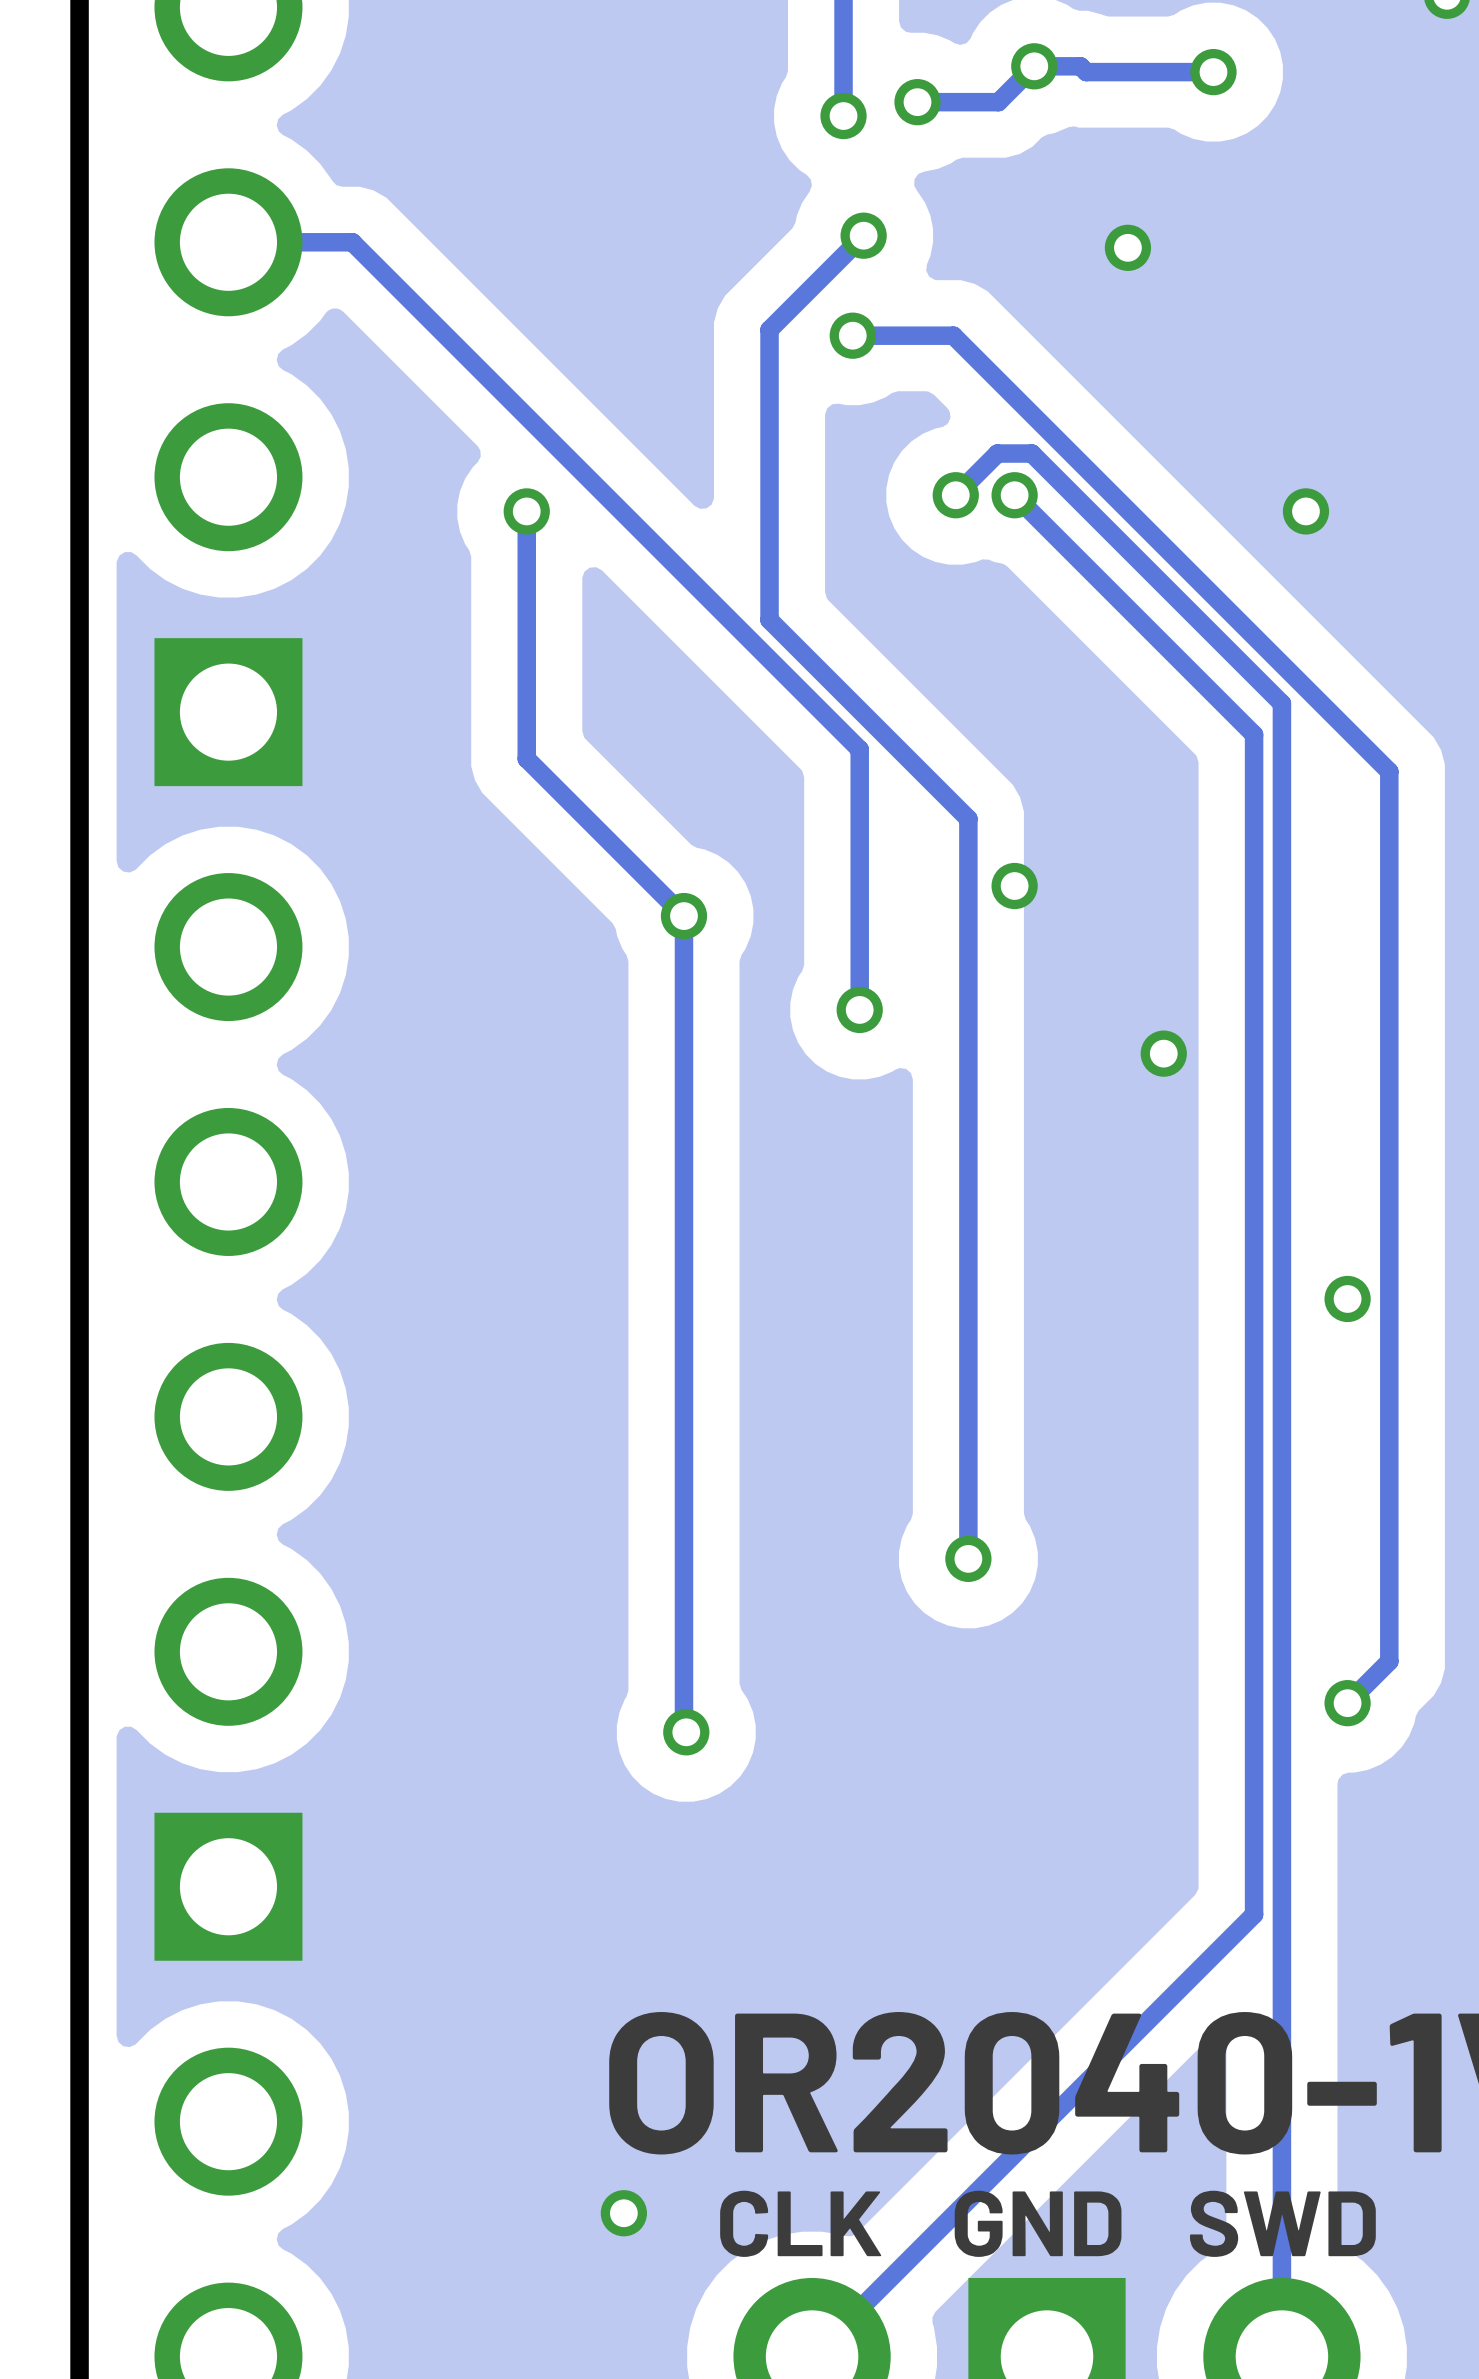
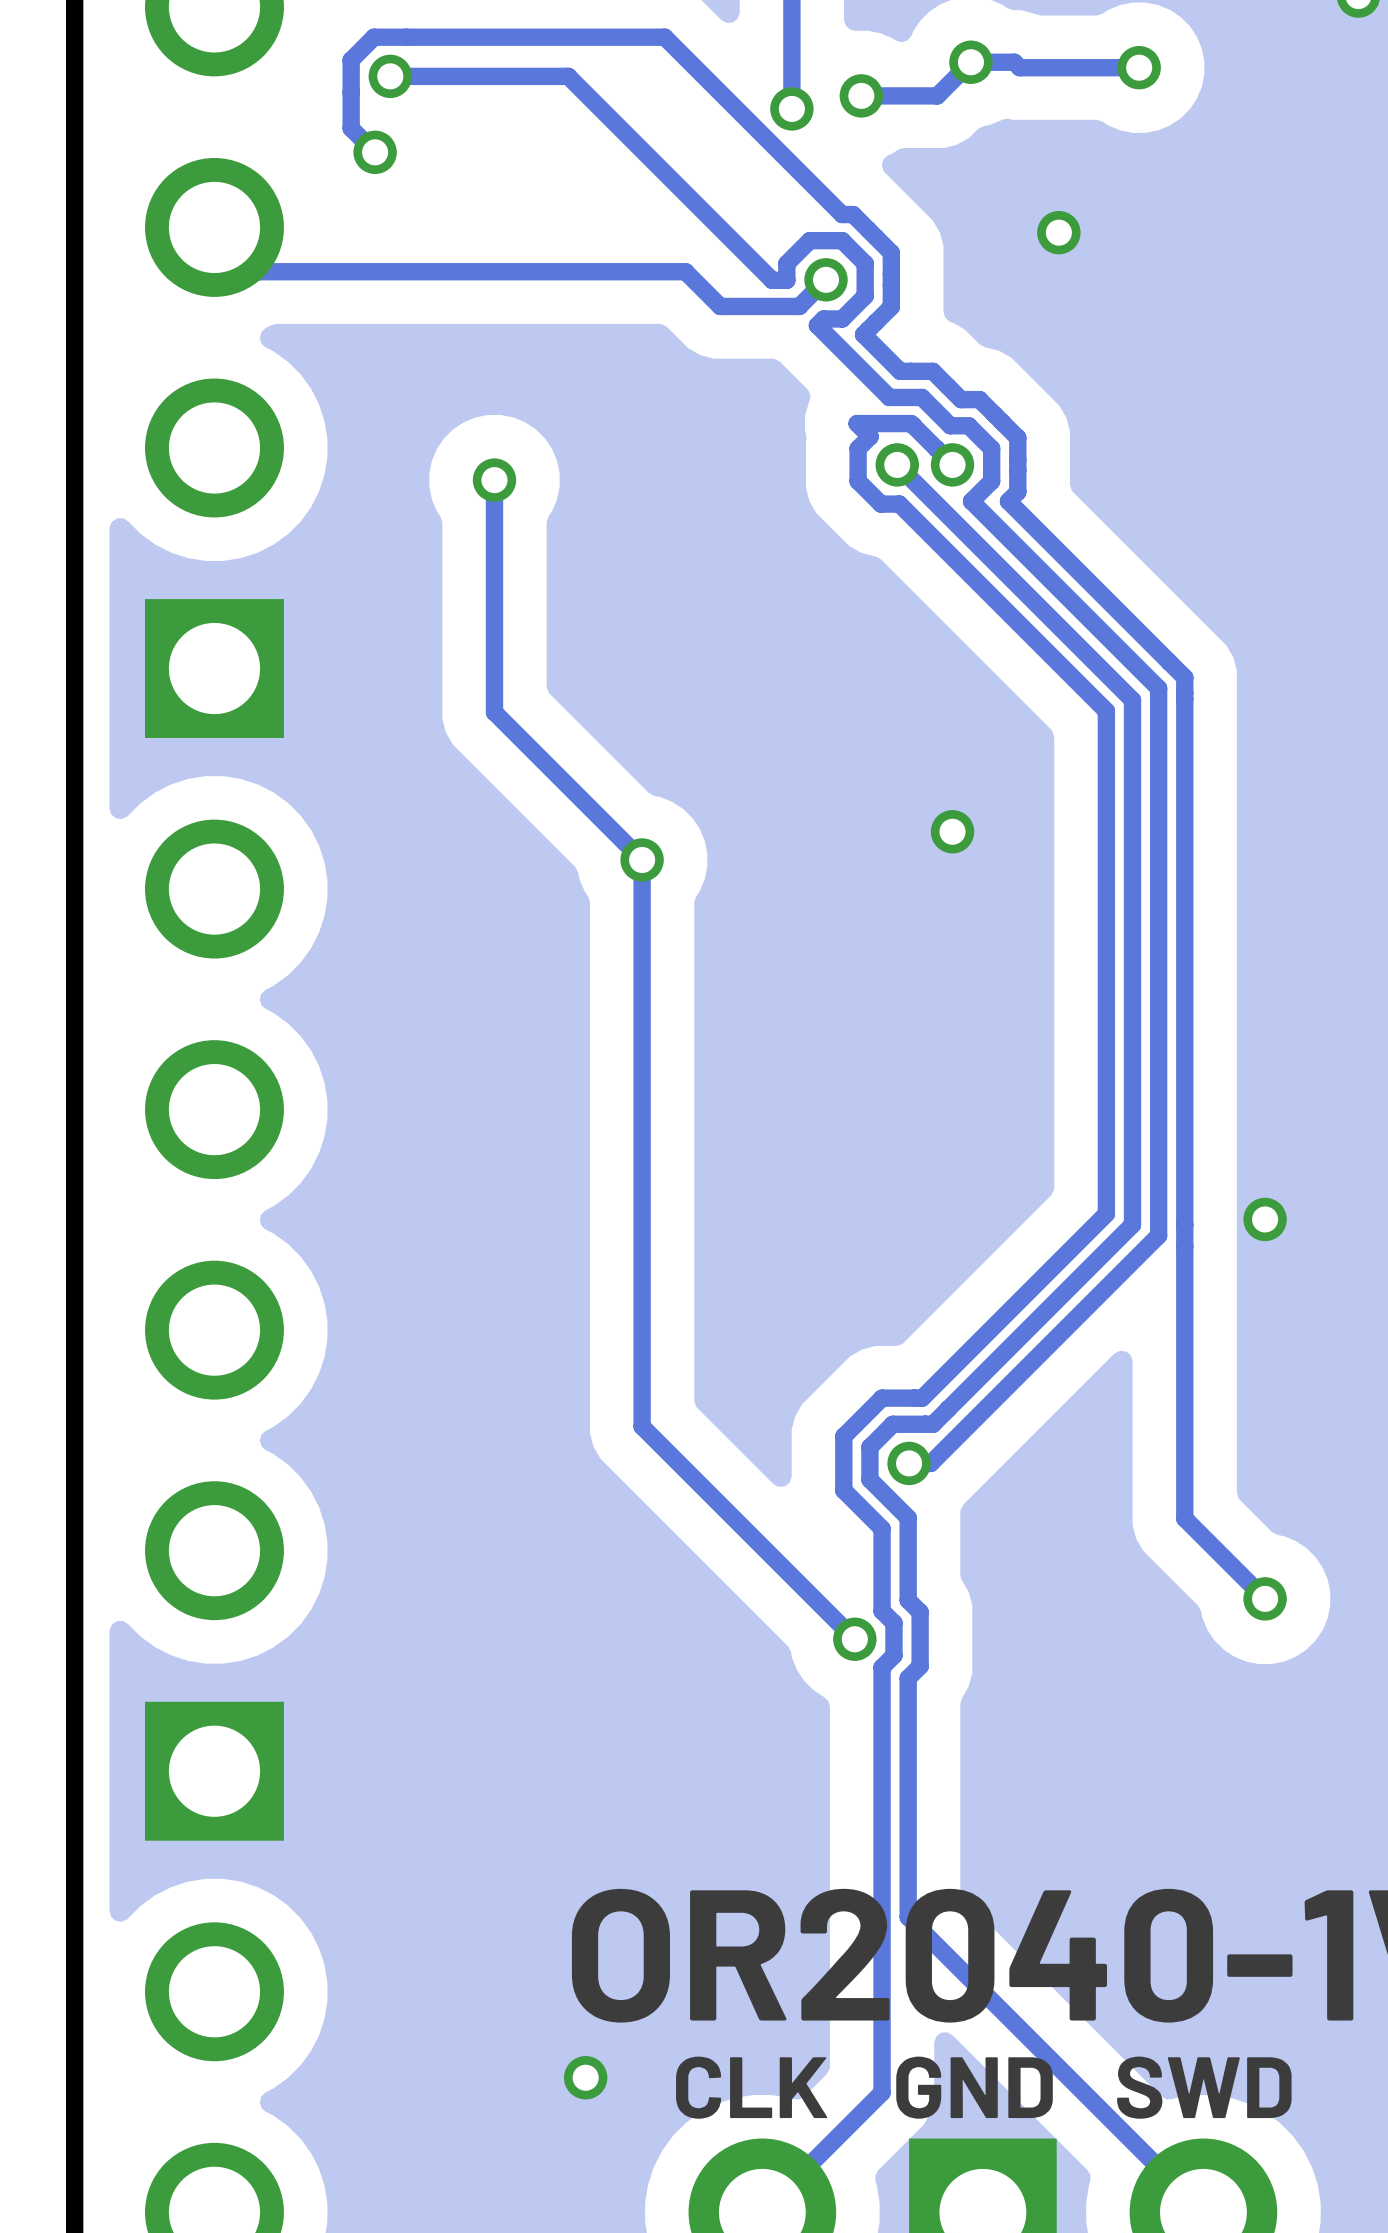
via: none -> (390, 76)
via: none -> (375, 152)
track: (863, 235) (769, 329) (769, 620) (968, 818) (968, 1558) -> (991, 448) (991, 481) (971, 501) (1158, 688) (1158, 1235) (930, 1463) (909, 1463)
via: (863, 235) -> none
track: (228, 242) (352, 242) (859, 749) (859, 1009) -> (214, 227) (258, 271) (685, 271) (720, 306) (799, 306) (826, 279)
track: (852, 335) (953, 335) (1043, 425) -> (375, 152) (351, 128) (351, 60) (374, 37) (664, 37) (842, 214) (853, 214) (891, 252) (891, 306) (863, 334) (900, 371) (932, 371) (961, 399) (979, 399)
via position: (852, 335) -> (826, 279)
track: (1012, 453) (997, 453) (955, 495) -> (950, 425) (922, 397) (889, 397) (817, 325) (823, 318) (842, 318) (865, 296) (865, 263) (842, 240) (809, 240) (786, 263) (786, 280) (772, 280) (568, 76) (390, 76)
track: (1084, 466) (1389, 771) (1389, 1661) (1347, 1703) -> (1017, 437) (1017, 491) (1008, 501) (1184, 677) (1184, 1518) (1265, 1598)
track: (1056, 477) (1281, 703) (1281, 2356) -> (897, 464) (1132, 700) (1132, 1224) (933, 1424) (892, 1424) (869, 1447) (869, 1479) (908, 1517) (908, 1600) (920, 1612) (920, 1666) (908, 1678) (908, 1917) (1203, 2212)
track: (1014, 495) (1254, 734) (1254, 1914) (939, 2229) -> (952, 464) (911, 423) (857, 423) (870, 436) (858, 448) (858, 481) (881, 504) (899, 504) (1106, 710) (1106, 1213) (922, 1398) (882, 1398) (843, 1436) (843, 1490) (882, 1528) (882, 1611) (893, 1623) (893, 1655) (882, 1667) (882, 2092)
via: (1305, 511) -> none
via: (859, 1009) -> none
via: (1163, 1053) -> none
track: (683, 1519) (683, 1729) (686, 1732) -> (642, 1426) (854, 1639)
via position: (686, 1732) -> (854, 1639)

